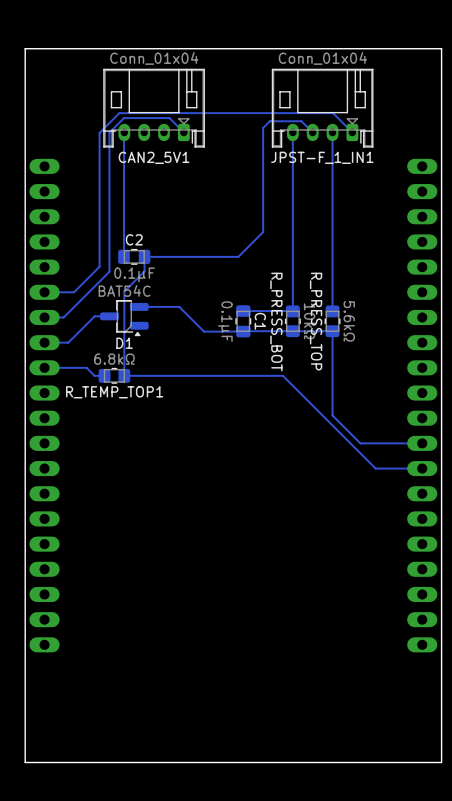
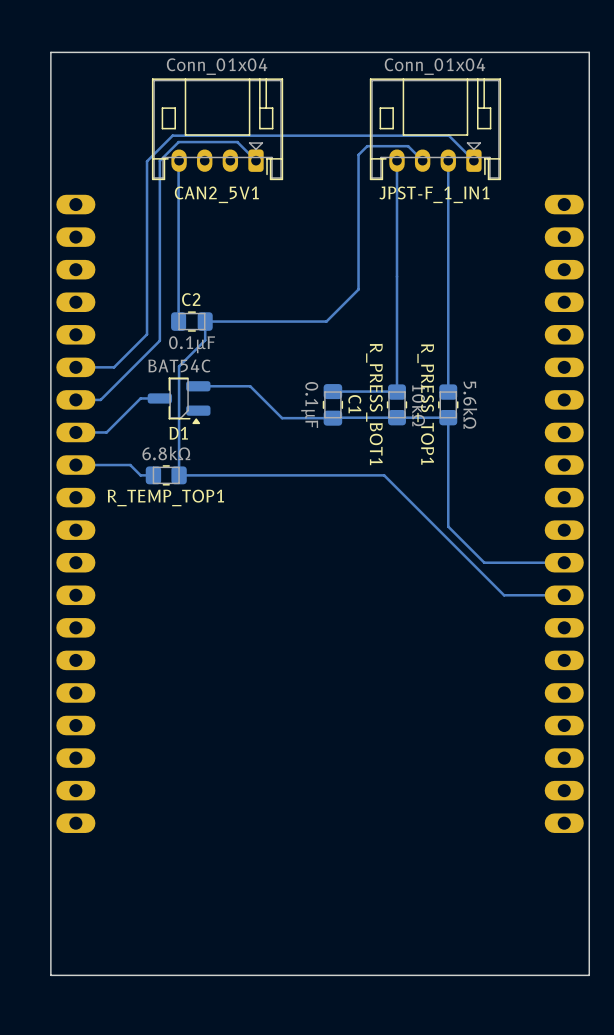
R_PRESS_TOP name: R_PRESS_TOP (316, 321) -> R_PRESS_TOP1 (425, 404)
R_PRESS_BOT name: R_PRESS_BOT (276, 322) -> R_PRESS_BOT1 (374, 404)

